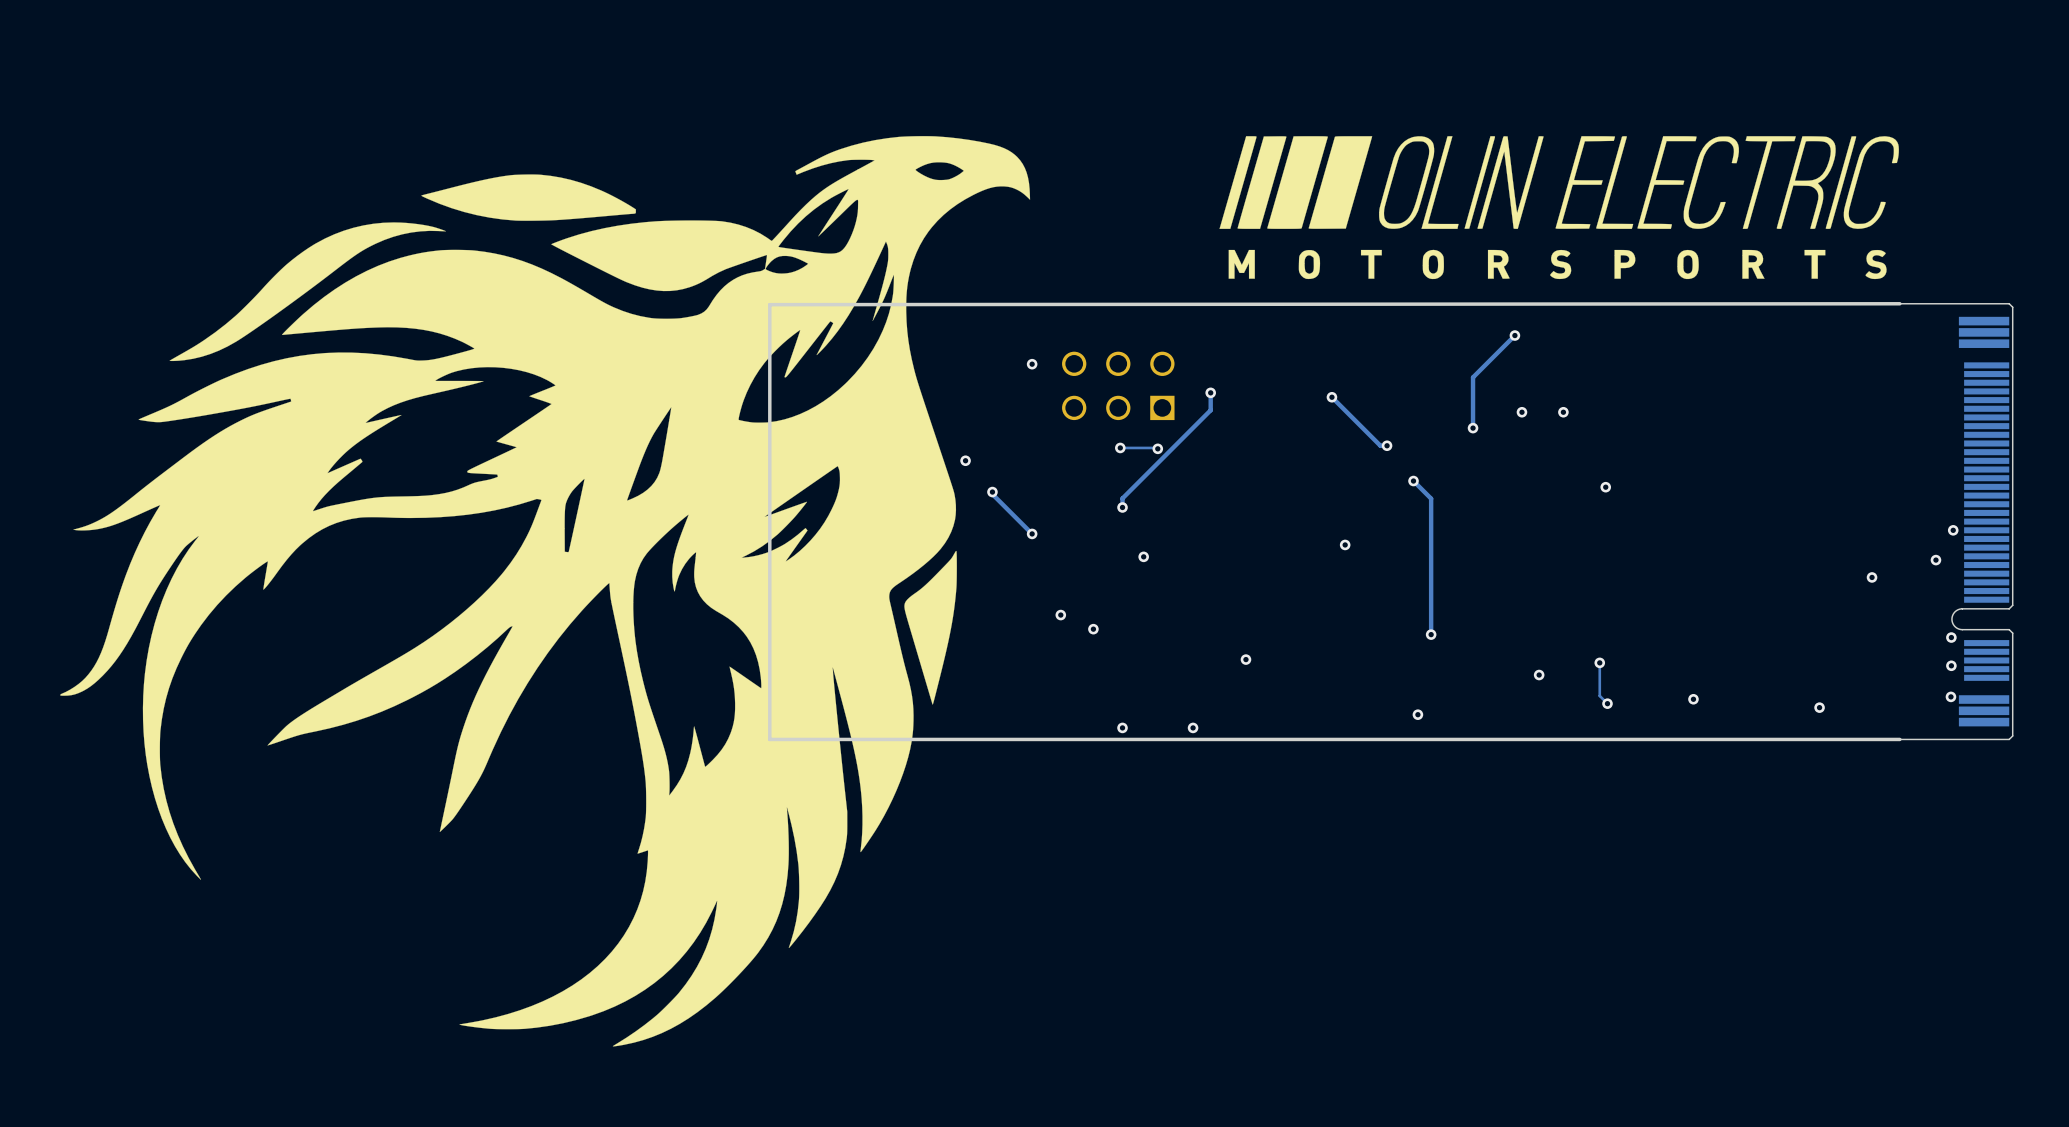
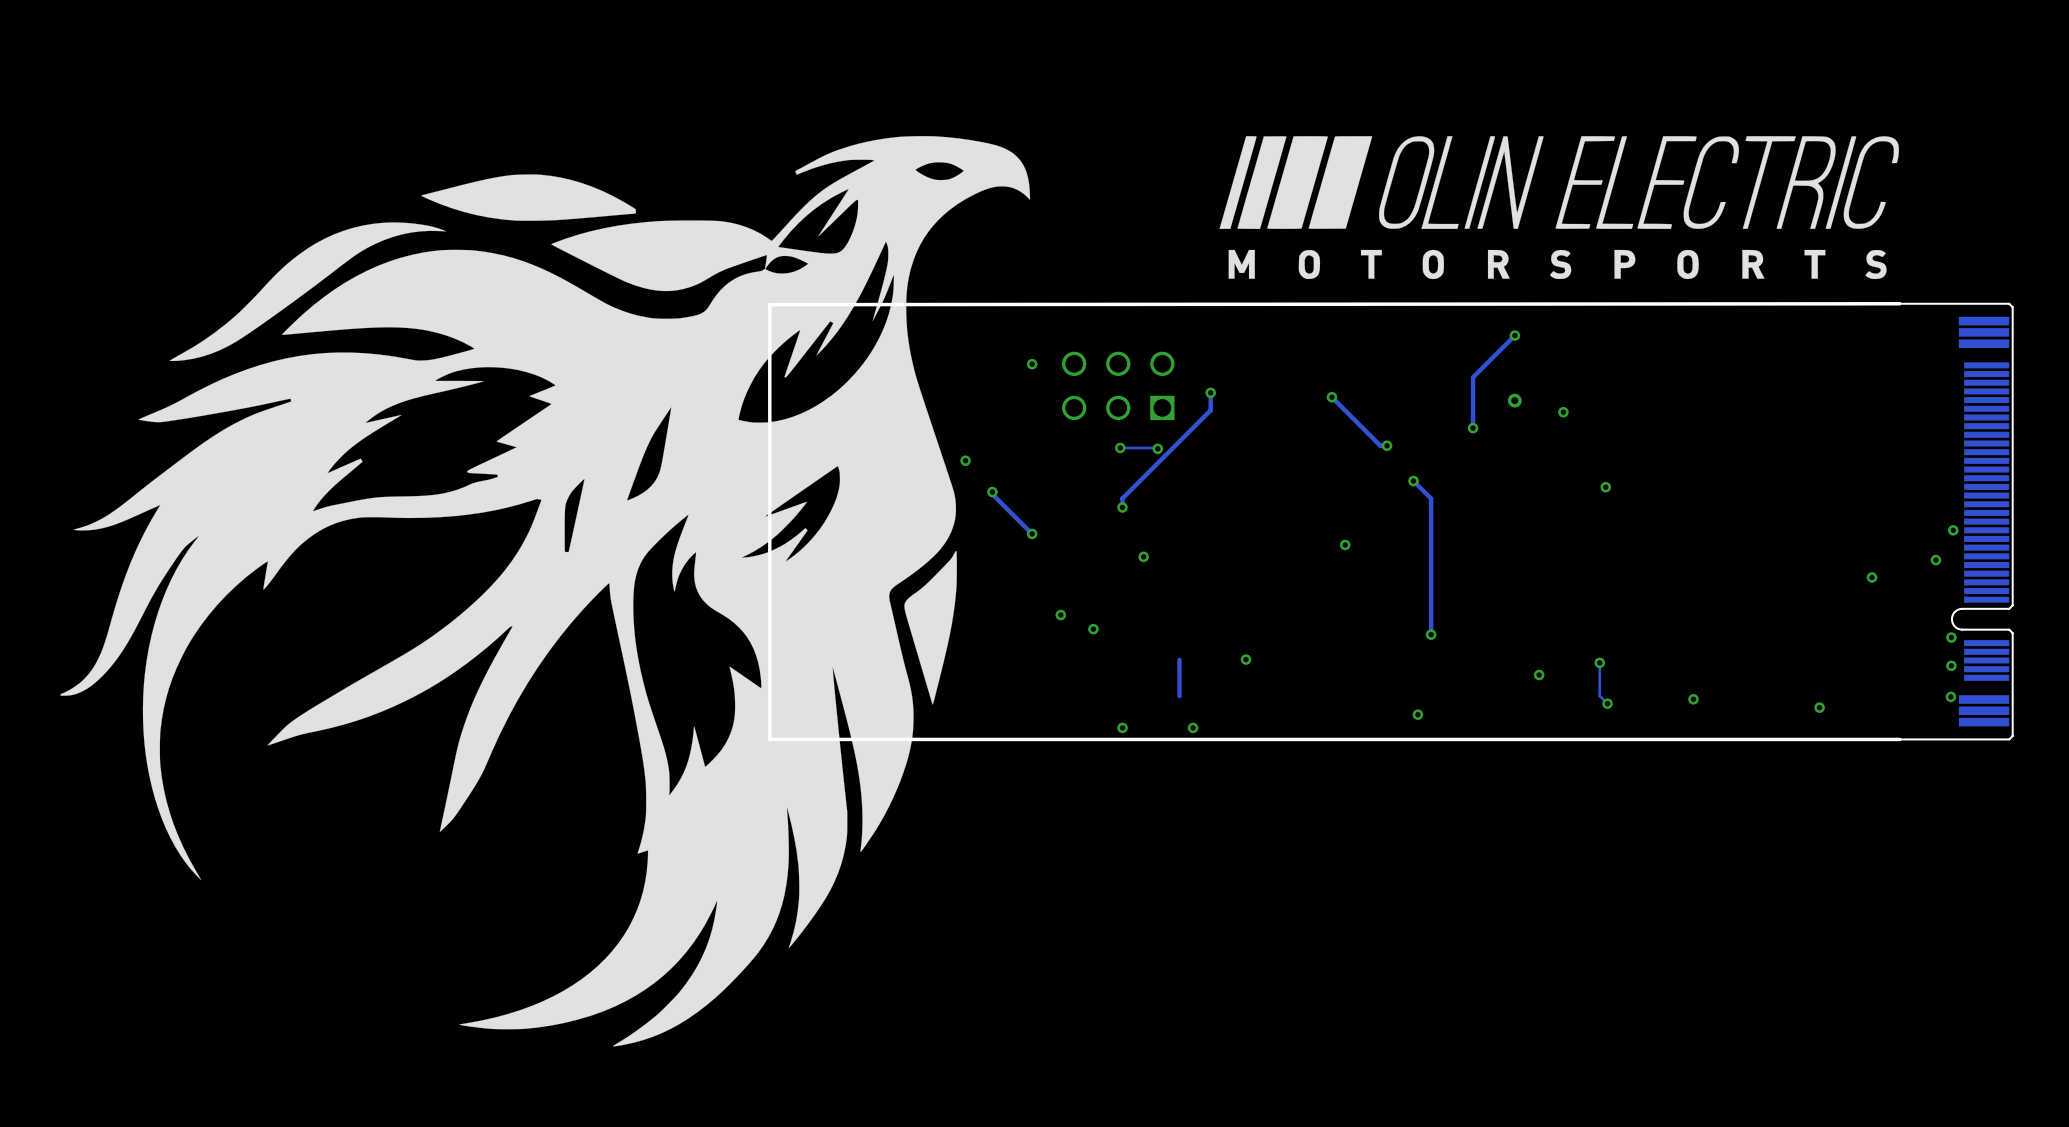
via position: (1521, 412) -> (1514, 400)
track: none -> (1179, 659) (1179, 696)

